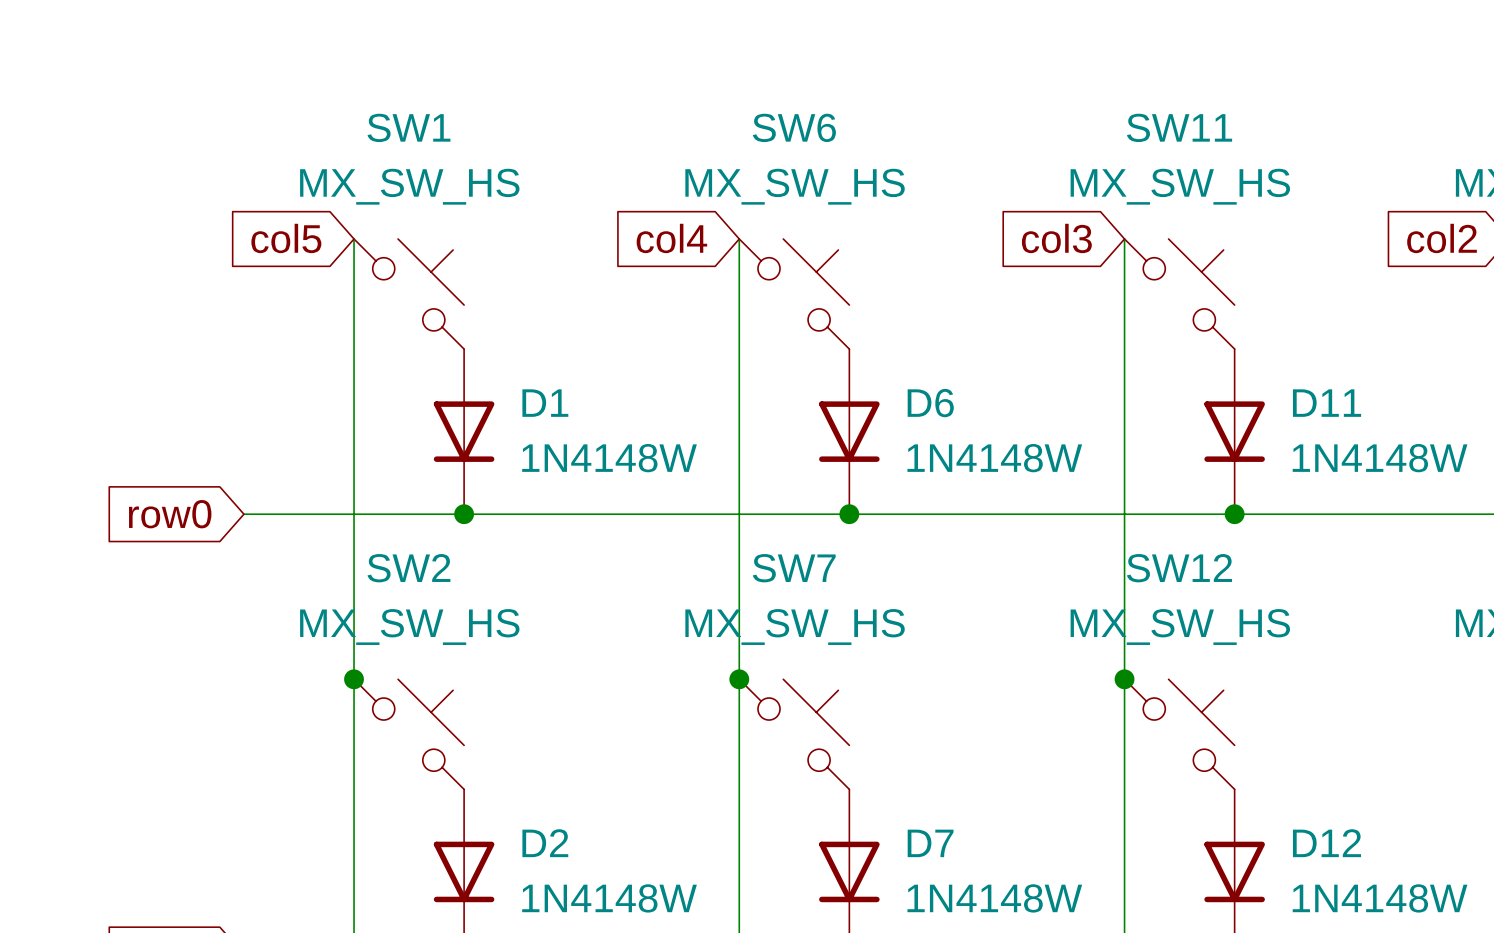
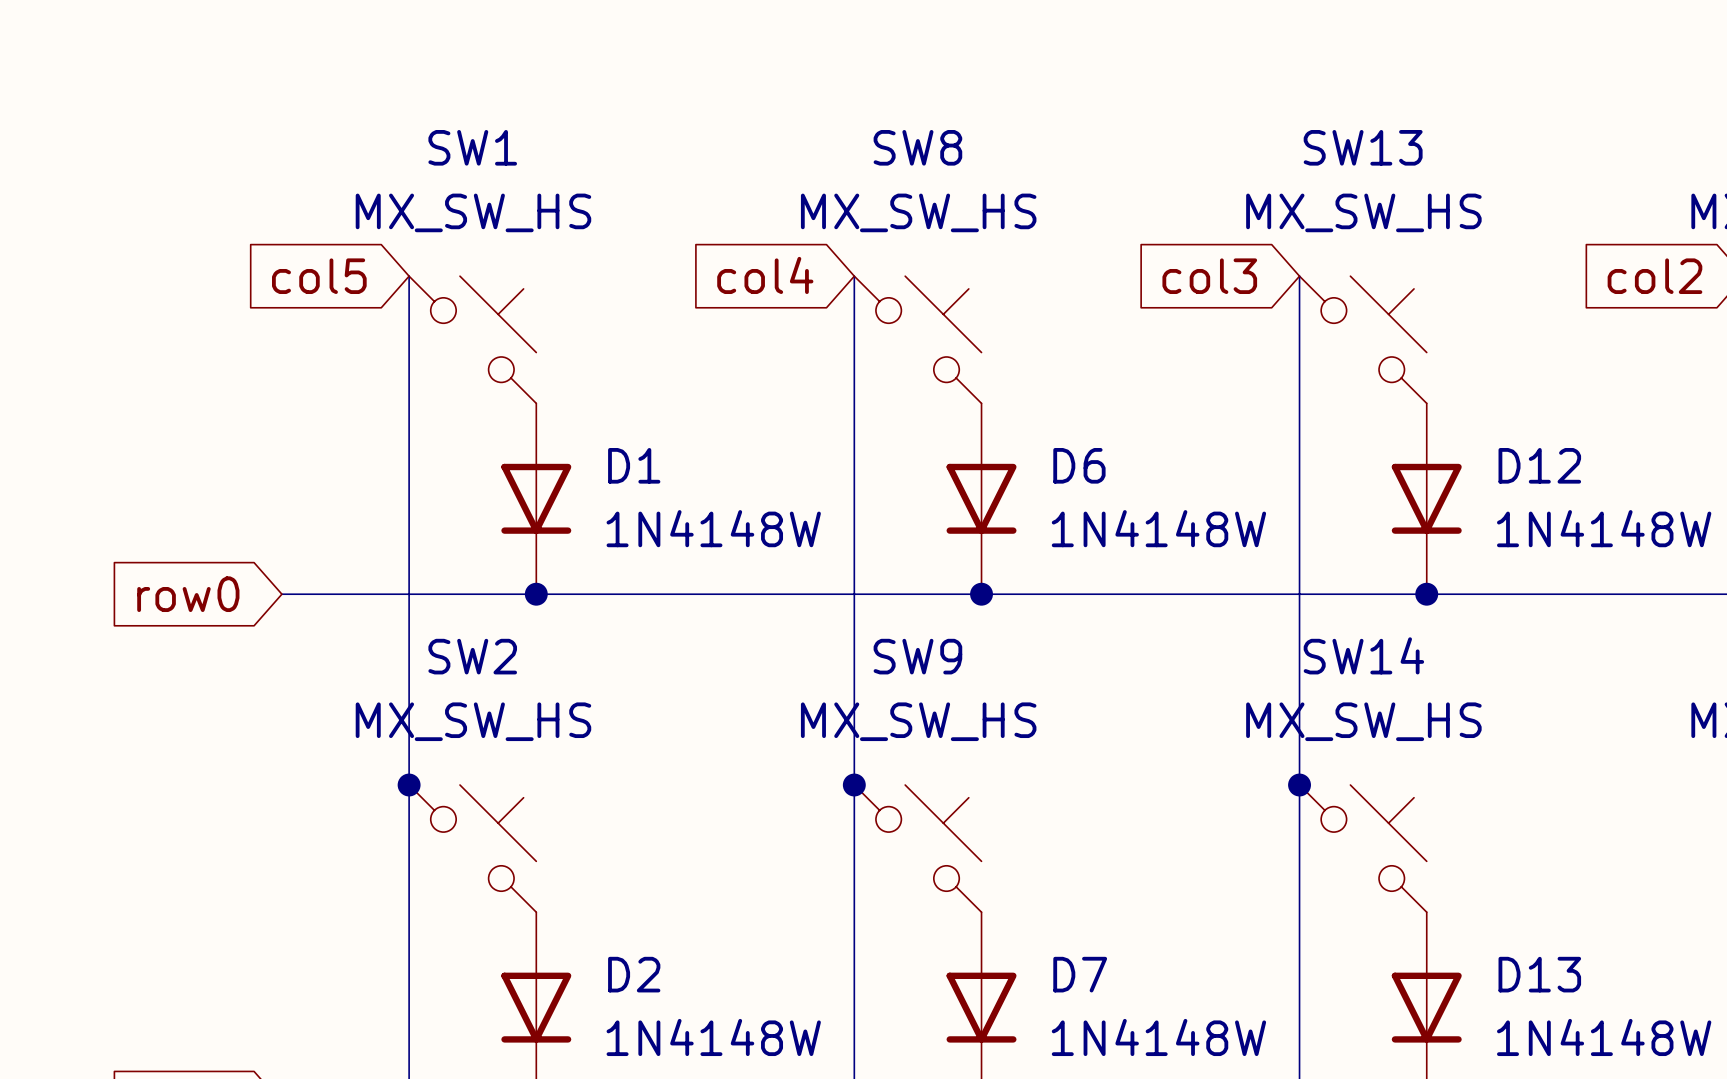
SW6 name: SW6 (794, 127) -> SW8 (917, 147)
SW11 name: SW11 (1179, 127) -> SW13 (1363, 147)
D11 name: D11 (1327, 403) -> D12 (1539, 465)
SW7 name: SW7 (794, 568) -> SW9 (917, 656)
SW12 name: SW12 (1179, 568) -> SW14 (1363, 655)
D12 name: D12 (1326, 843) -> D13 (1539, 974)

